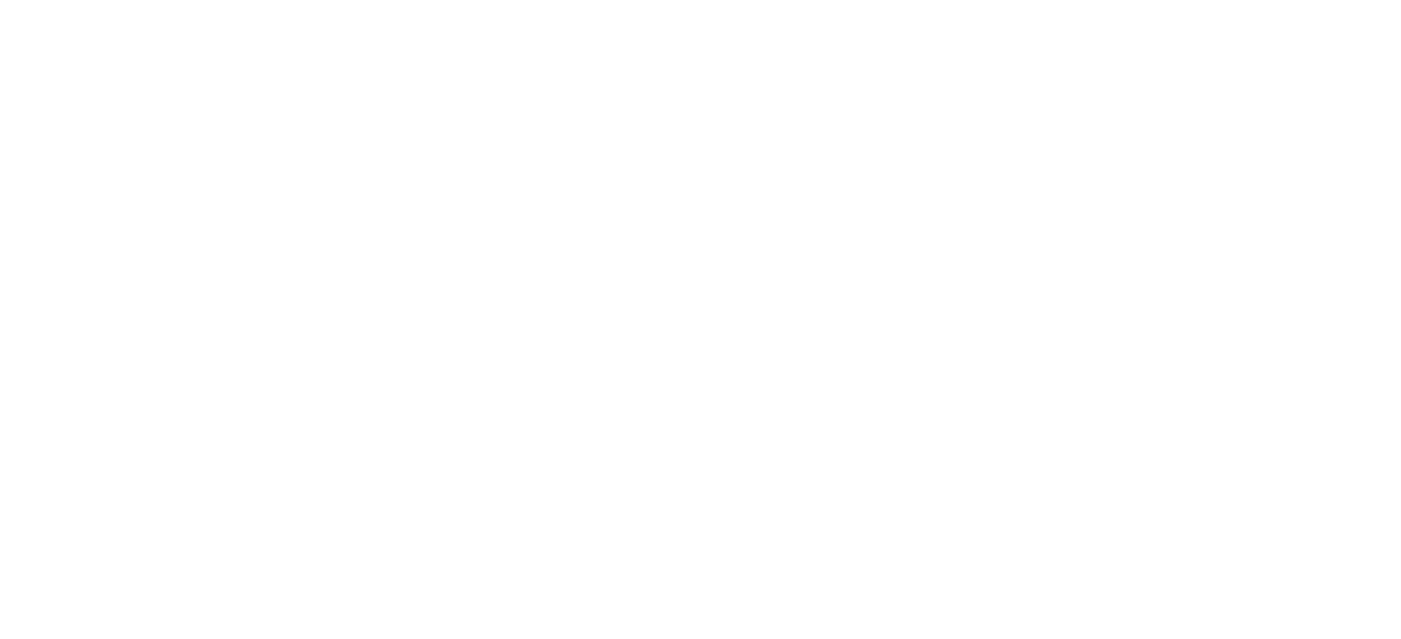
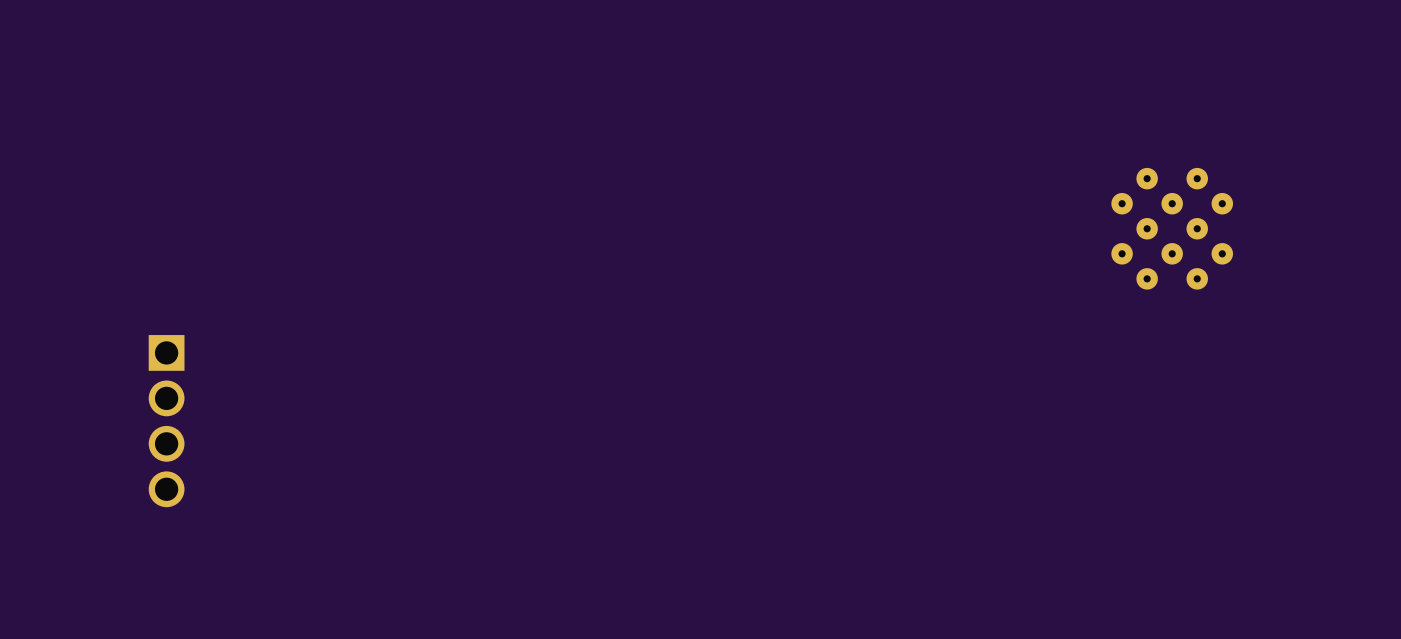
part: none -> (1172, 228)
part: none -> (166, 421)

